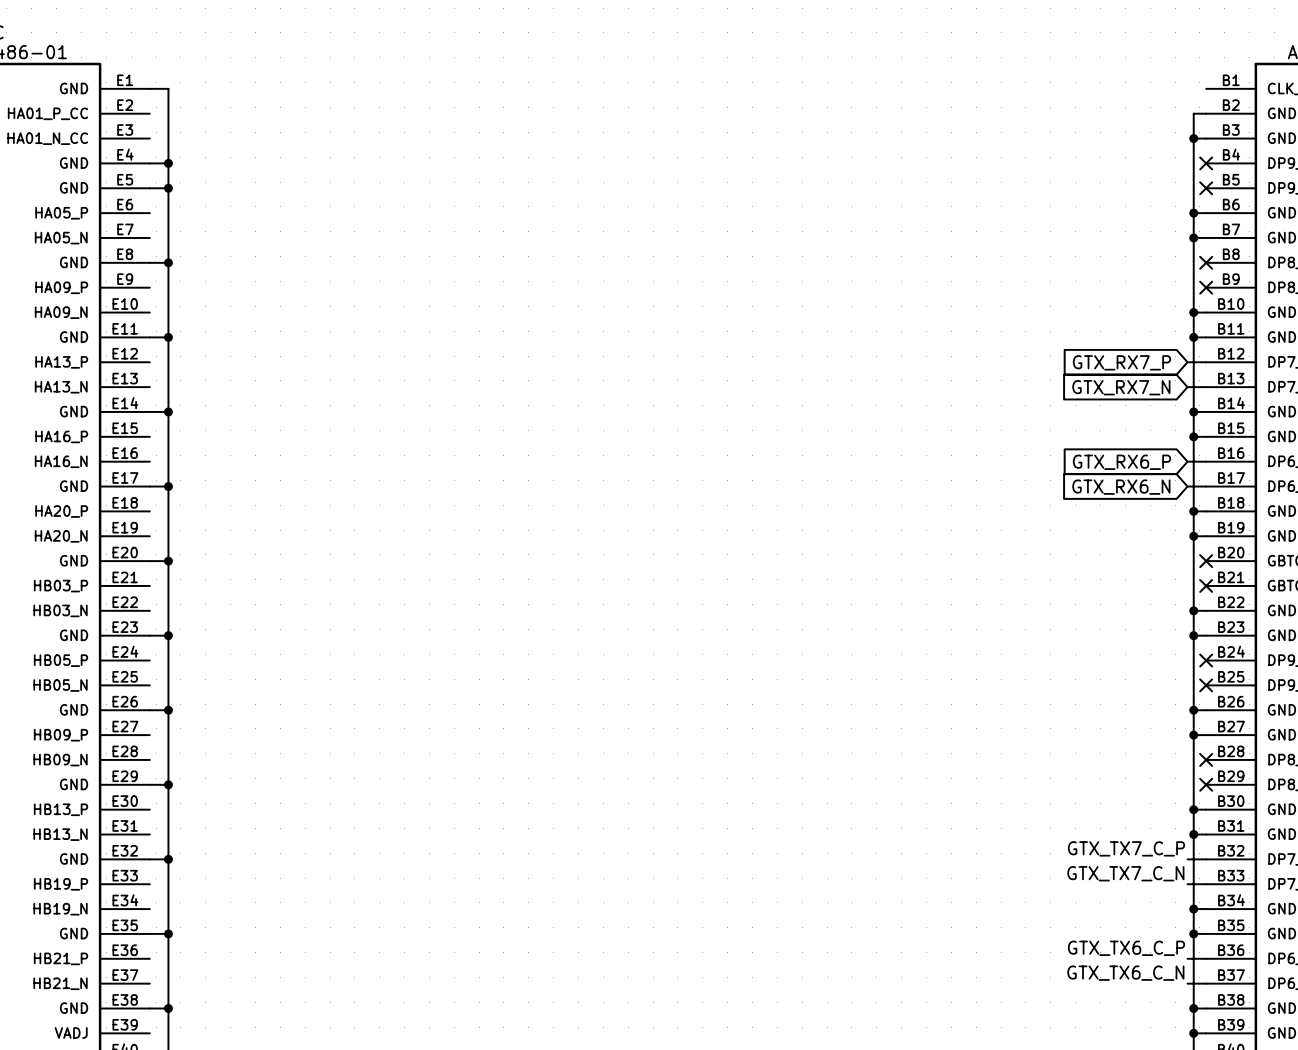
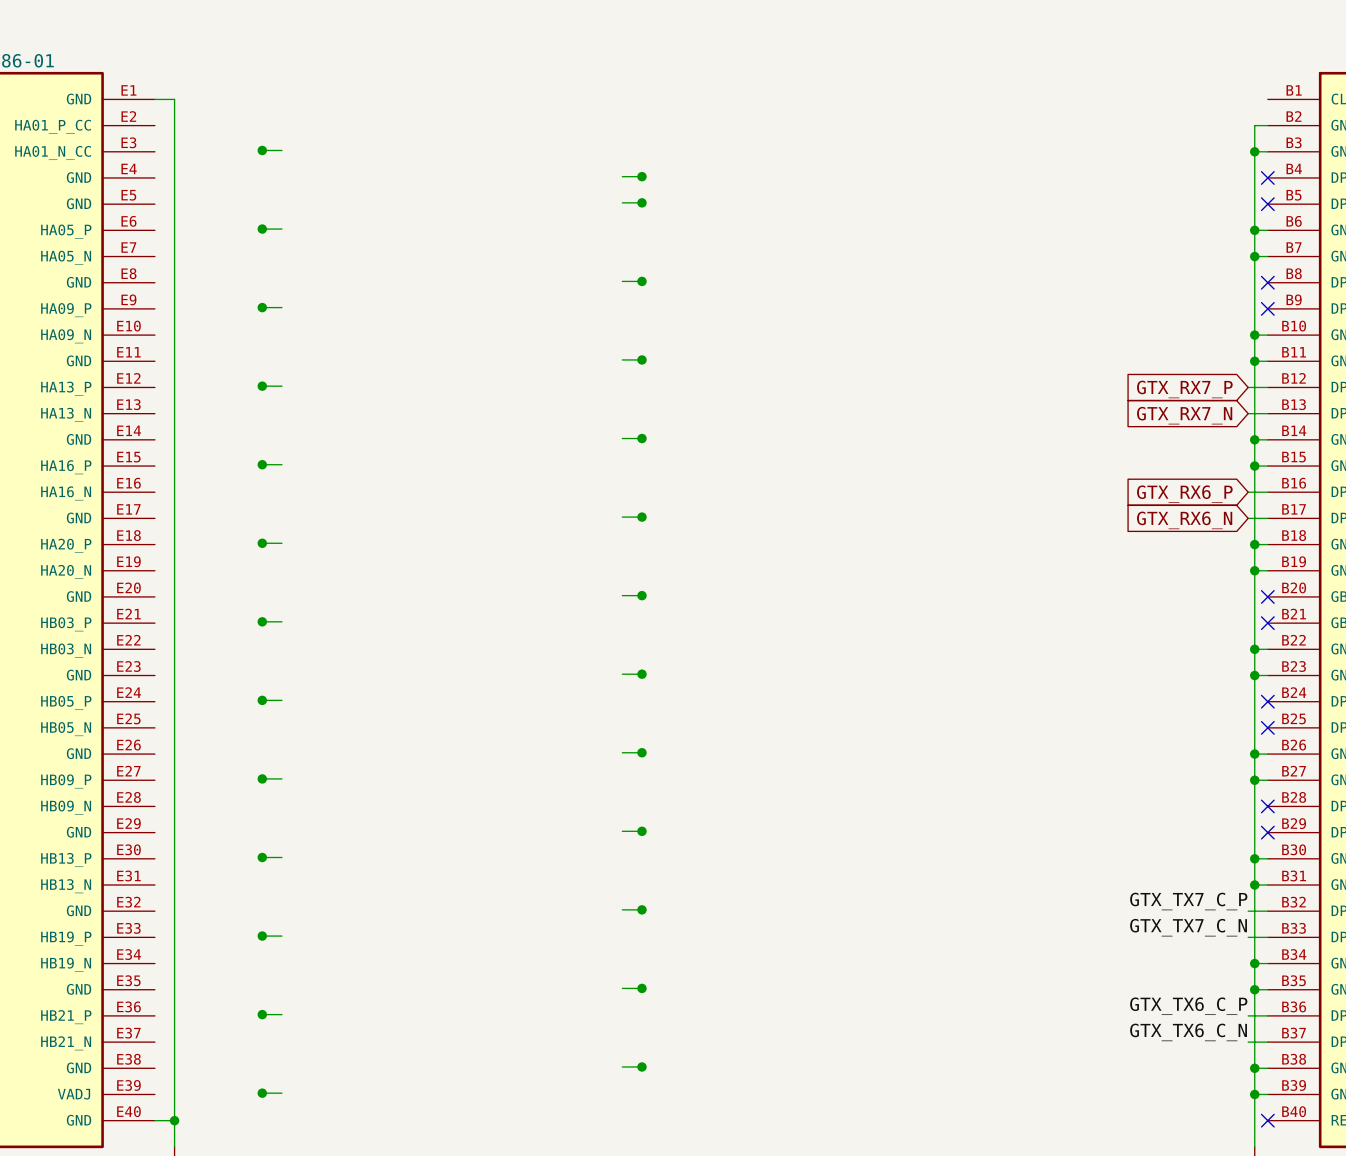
junction: none -> (262, 150)
wire: none -> (622, 176) (641, 176)
junction: none -> (641, 176)
wire: (149, 163) (168, 163) -> (262, 150) (281, 150)
junction: (168, 163) -> none
wire: none -> (622, 202) (641, 202)
junction: none -> (641, 202)
wire: (149, 188) (168, 188) -> (262, 229) (281, 229)
junction: (168, 188) -> none
junction: none -> (262, 229)
wire: none -> (622, 281) (641, 281)
junction: none -> (641, 281)
wire: (149, 262) (168, 262) -> (262, 307) (281, 307)
junction: (168, 262) -> none
junction: none -> (262, 307)
wire: none -> (622, 359) (641, 359)
junction: none -> (641, 359)
wire: (149, 337) (168, 337) -> (262, 386) (281, 386)
junction: (168, 337) -> none
junction: none -> (262, 386)
wire: none -> (622, 438) (641, 438)
junction: none -> (641, 438)
wire: (149, 411) (168, 411) -> (262, 464) (281, 464)
junction: (168, 411) -> none
junction: none -> (262, 464)
wire: none -> (622, 517) (641, 517)
junction: none -> (641, 517)
wire: (149, 486) (168, 486) -> (262, 543) (281, 543)
junction: (168, 486) -> none
junction: none -> (262, 543)
wire: none -> (622, 595) (641, 595)
junction: none -> (641, 595)
wire: (149, 561) (168, 561) -> (262, 621) (281, 621)
junction: (168, 561) -> none
junction: none -> (262, 621)
wire: none -> (622, 674) (641, 674)
junction: none -> (641, 674)
wire: (149, 635) (168, 635) -> (262, 700) (281, 700)
junction: (168, 635) -> none
junction: none -> (262, 700)
wire: none -> (622, 752) (641, 752)
junction: none -> (641, 752)
wire: (149, 710) (168, 710) -> (262, 778) (281, 778)
junction: (168, 710) -> none
junction: none -> (262, 778)
wire: none -> (622, 831) (641, 831)
junction: none -> (641, 831)
wire: (149, 784) (168, 784) -> (262, 857) (281, 857)
junction: (168, 784) -> none
junction: none -> (262, 857)
wire: none -> (622, 909) (641, 909)
junction: none -> (641, 909)
wire: (149, 859) (168, 859) -> (262, 936) (281, 936)
junction: (168, 859) -> none
junction: none -> (262, 936)
wire: none -> (622, 988) (641, 988)
junction: none -> (641, 988)
wire: (149, 933) (168, 933) -> (262, 1014) (281, 1014)
junction: (168, 933) -> none
junction: none -> (262, 1014)
wire: none -> (622, 1066) (641, 1066)
junction: none -> (641, 1066)
wire: (149, 1008) (168, 1008) -> (262, 1093) (281, 1093)
junction: (168, 1008) -> none
junction: none -> (262, 1093)

